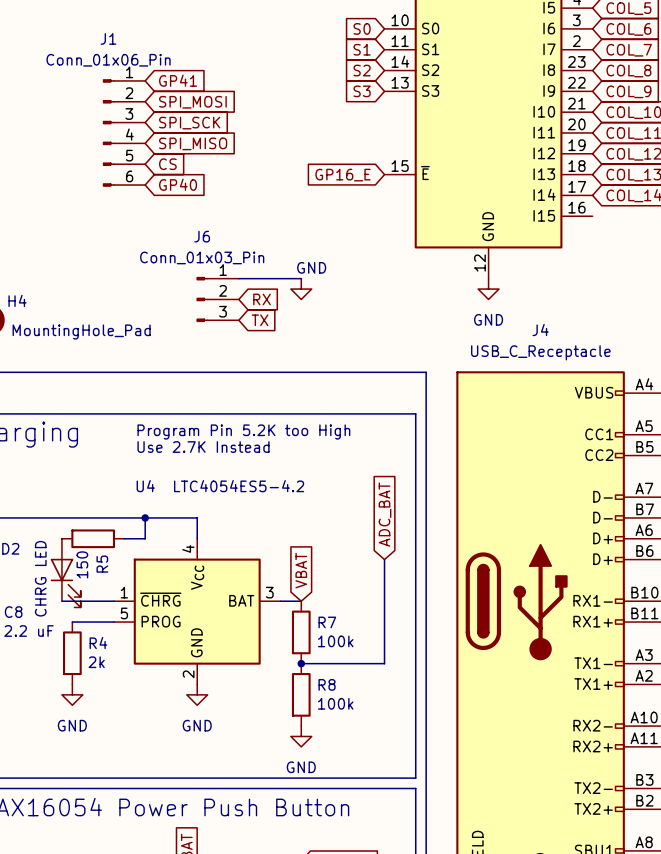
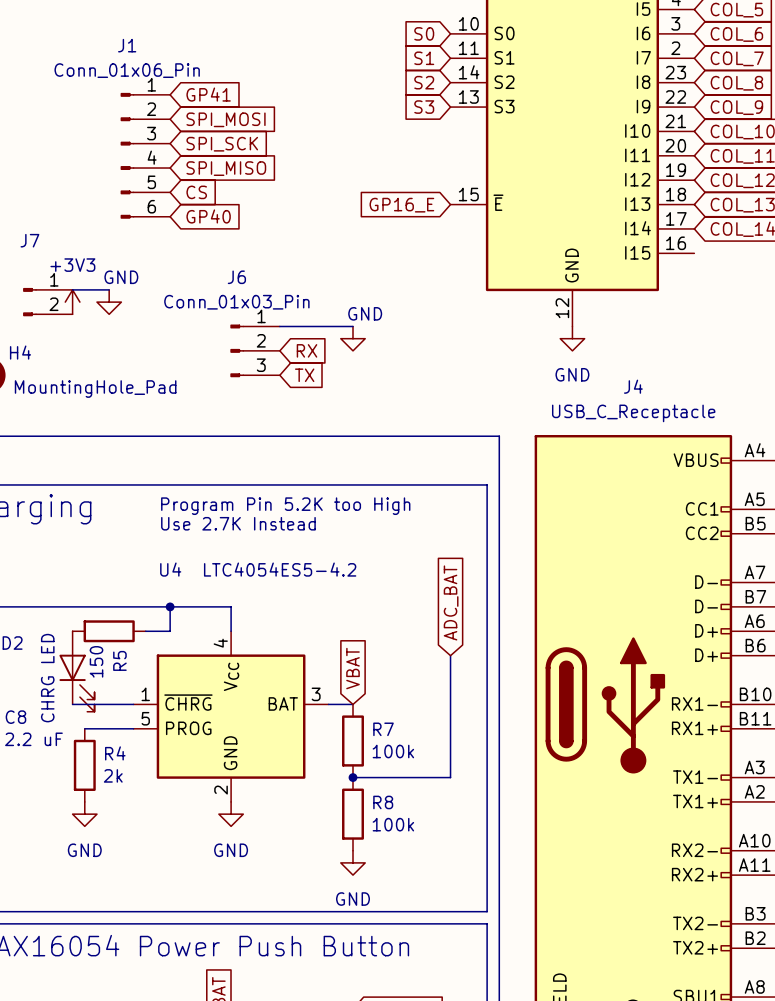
wire: none -> (72, 289) (109, 289)
J7: none -> (47, 302)
power symbol: none -> +3V3 (72, 302)
power symbol: none -> GND (109, 302)

